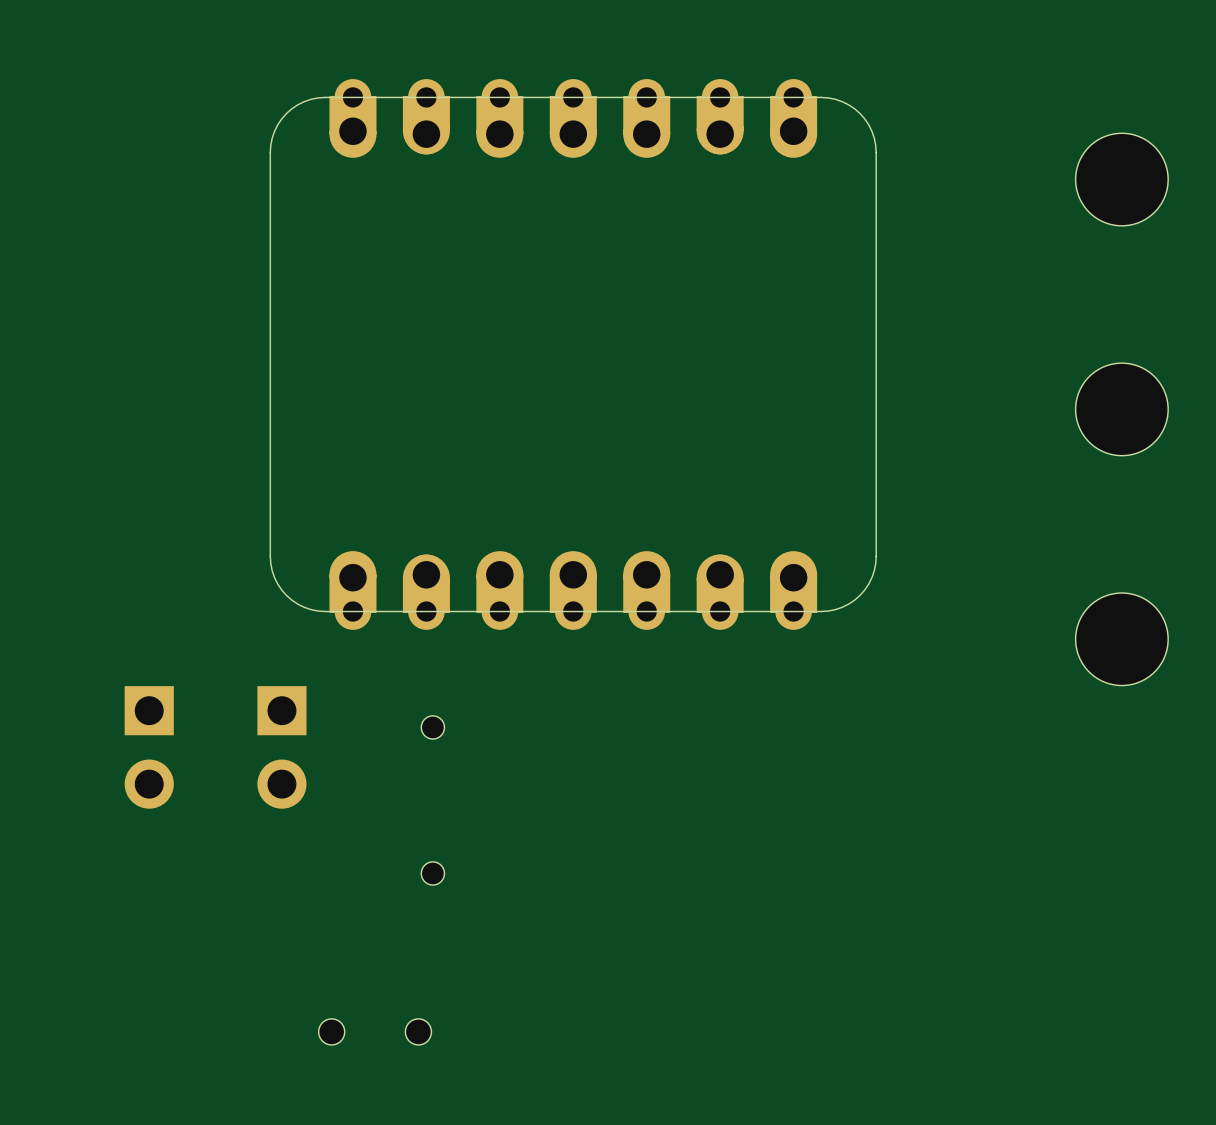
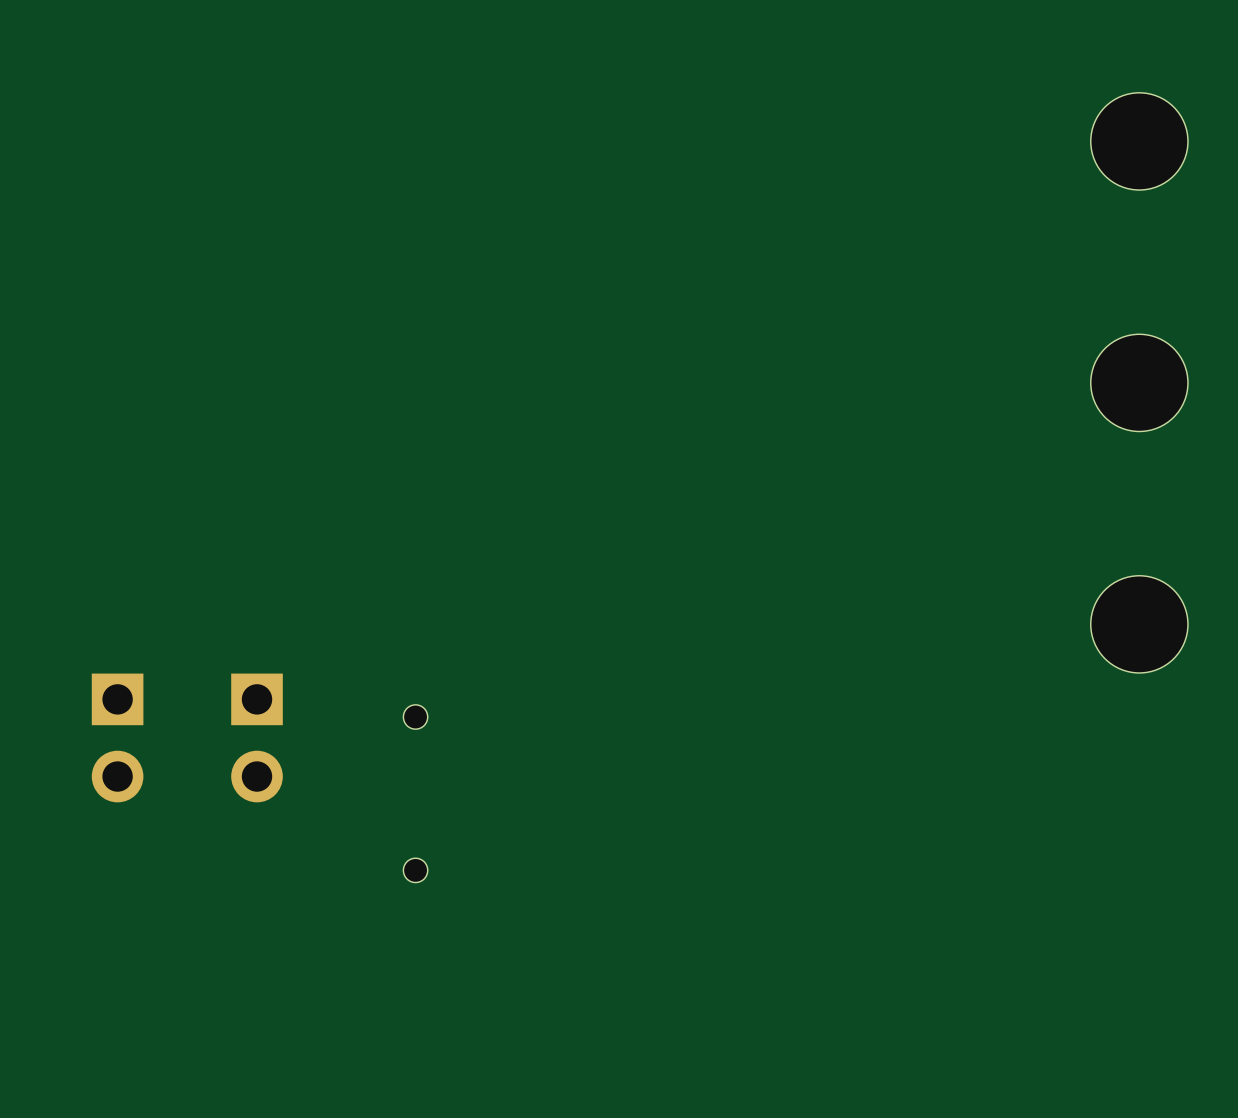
part: (573, 354) -> none
part: (375, 1031) -> none

